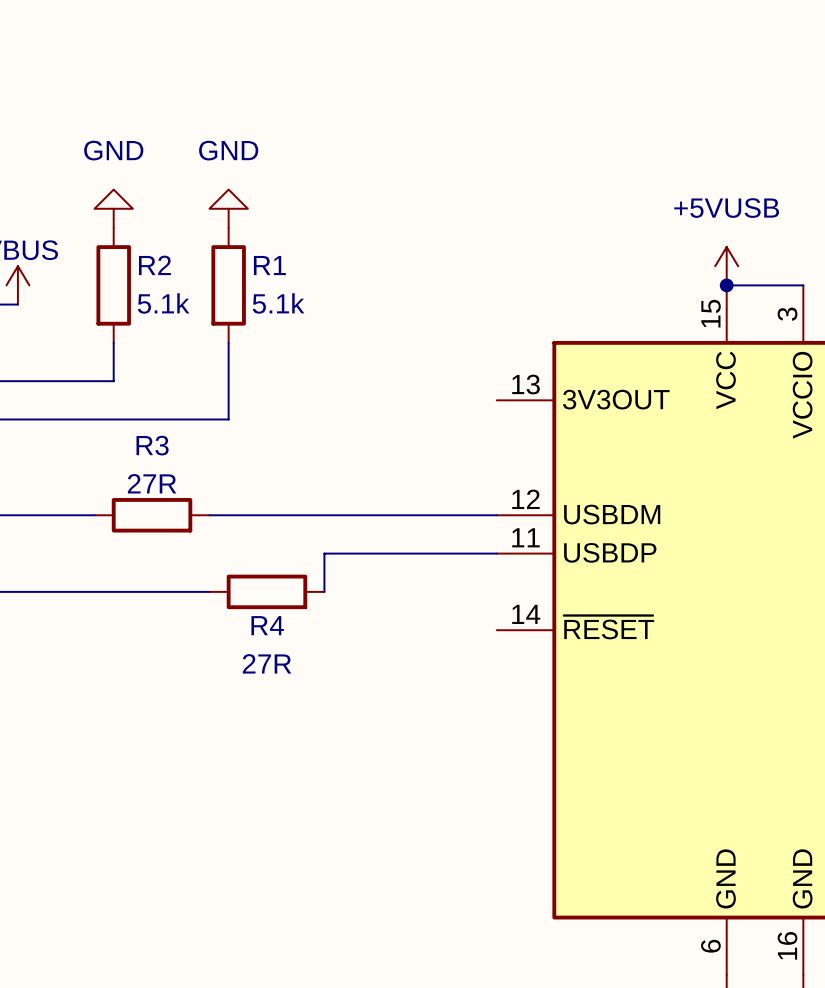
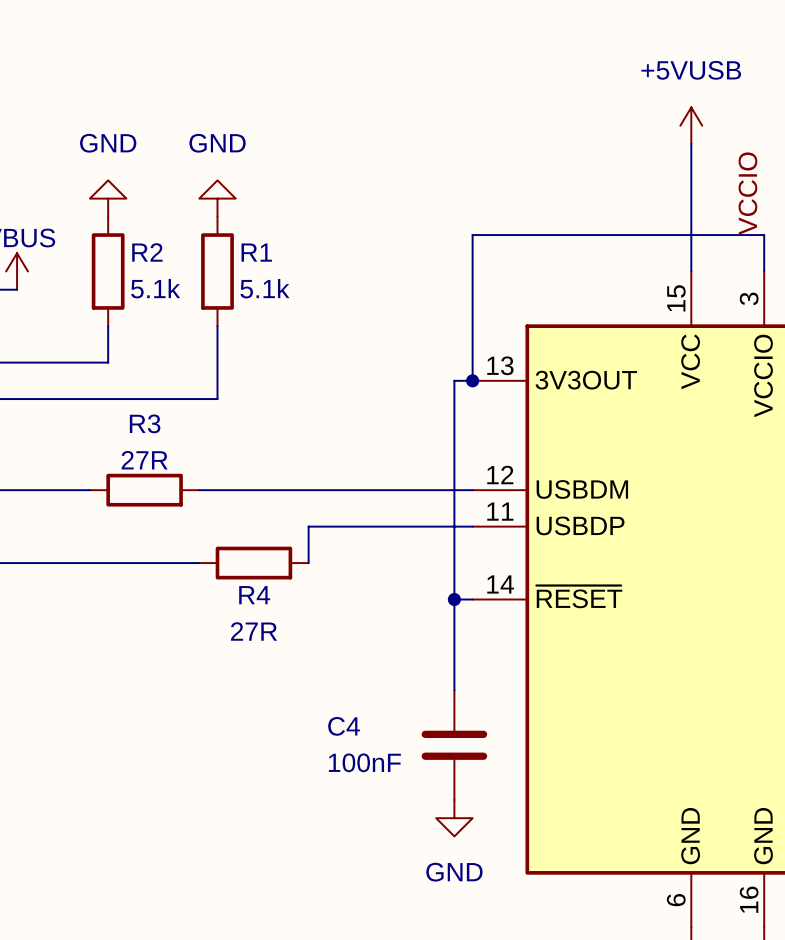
label: none -> VCCIO (747, 193)
power symbol position: +5VUSB (726, 266) -> +5VUSB (691, 125)
wire: (726, 285) (803, 285) -> (691, 271) (691, 143)
junction: (726, 285) -> none
wire: none -> (764, 271) (764, 235) (472, 235) (472, 380) (454, 380) (454, 690)
junction: none -> (472, 380)
wire: none -> (454, 599) (472, 599)
junction: none -> (454, 599)
C4: none -> 100nF (454, 745)
power symbol: none -> GND (454, 818)

